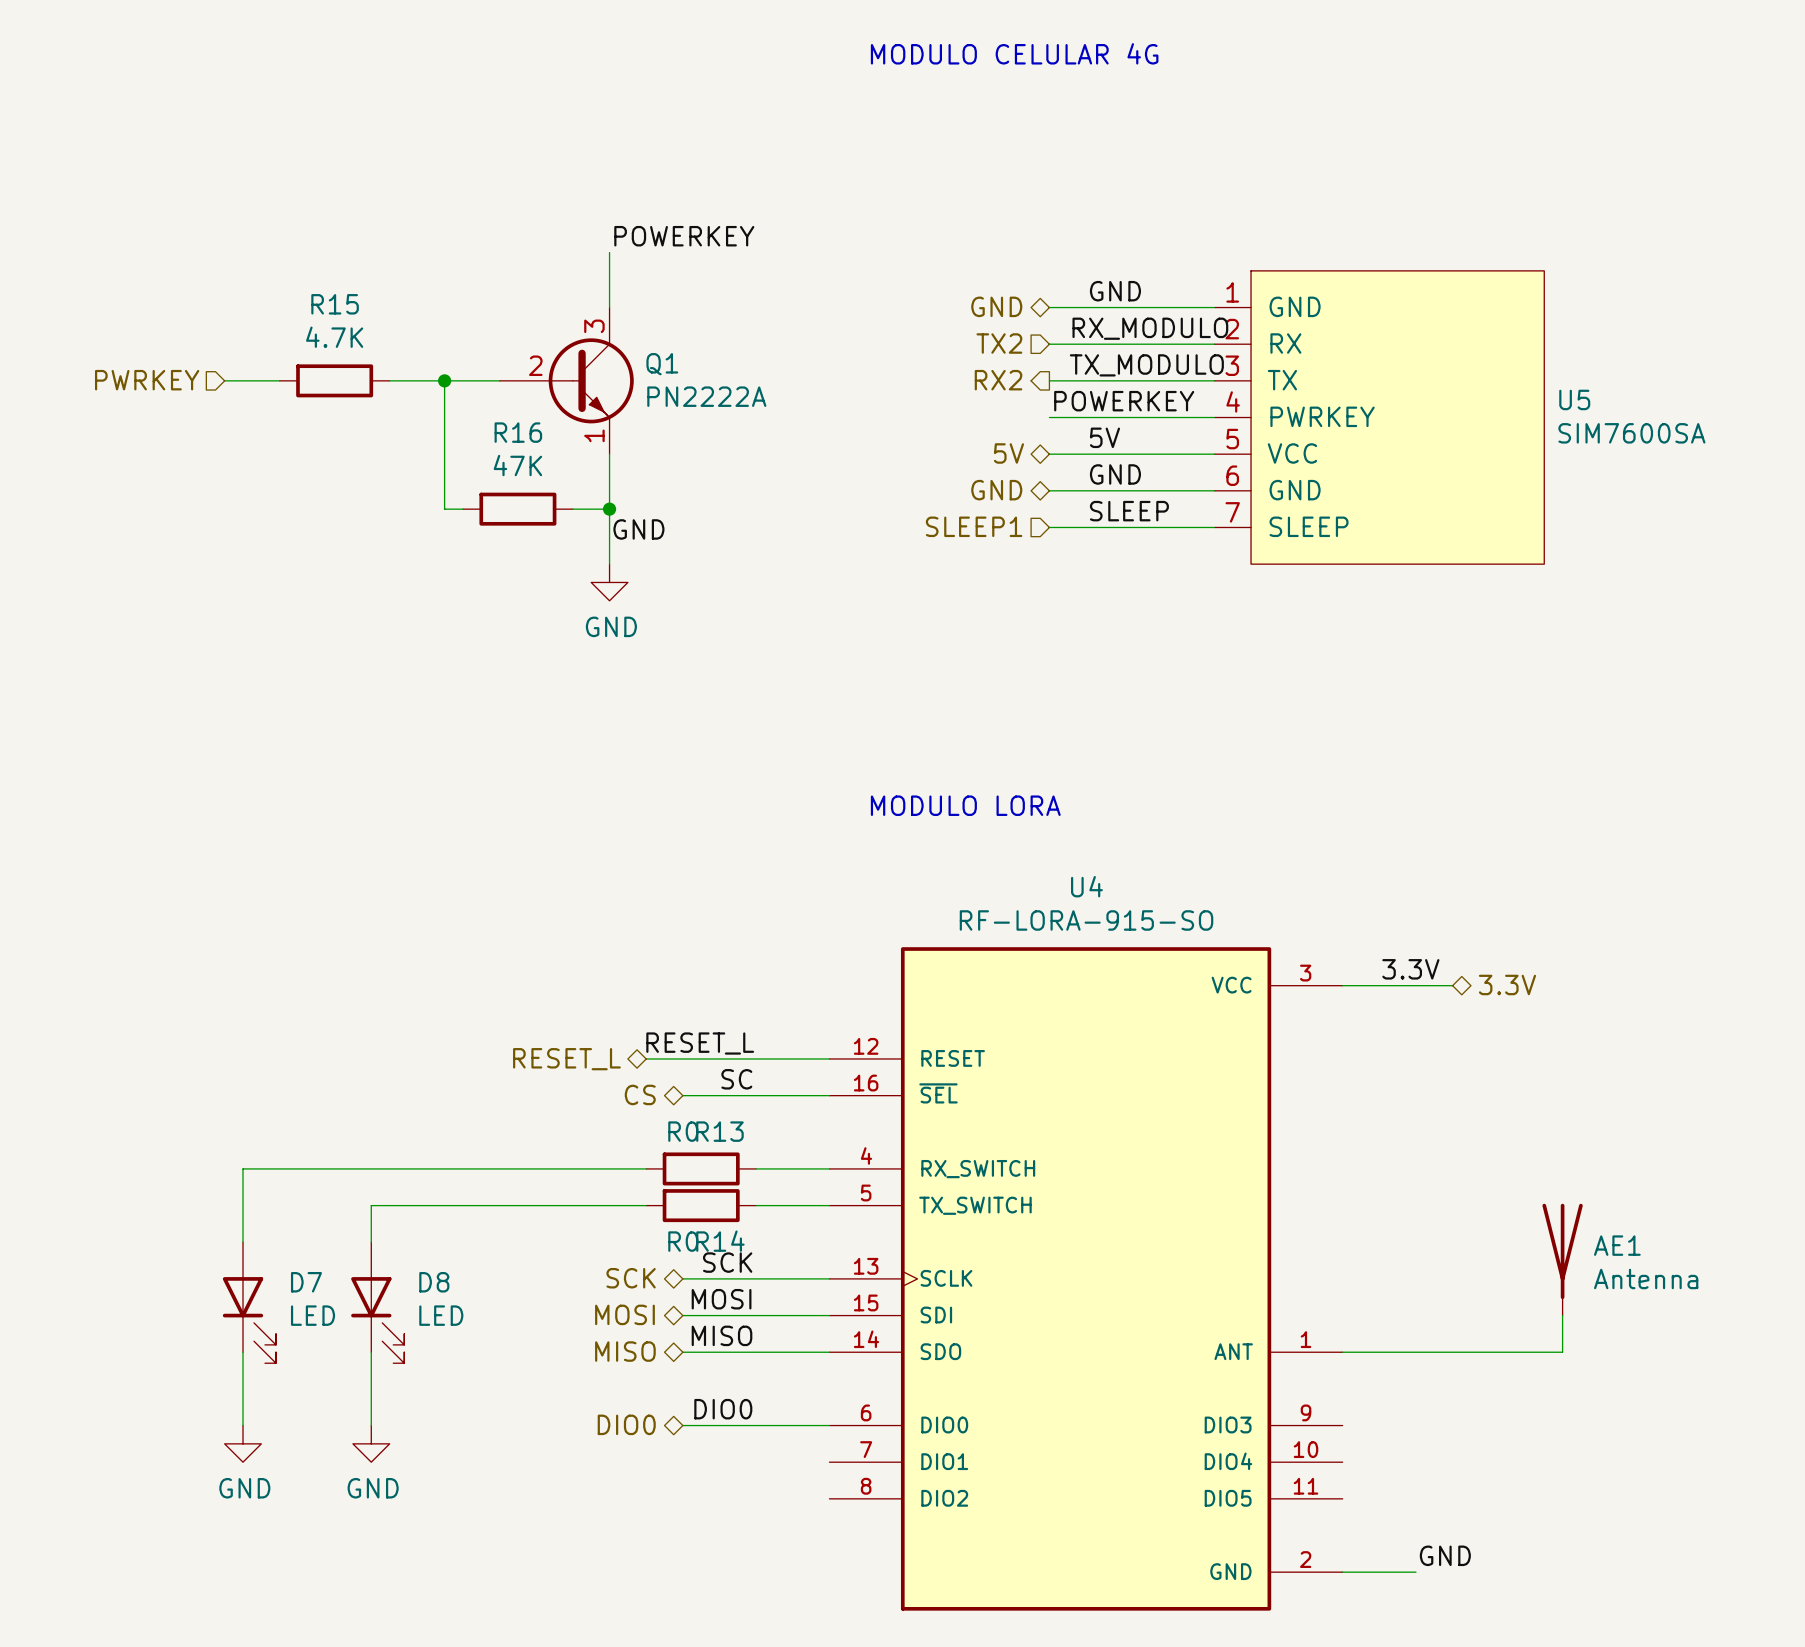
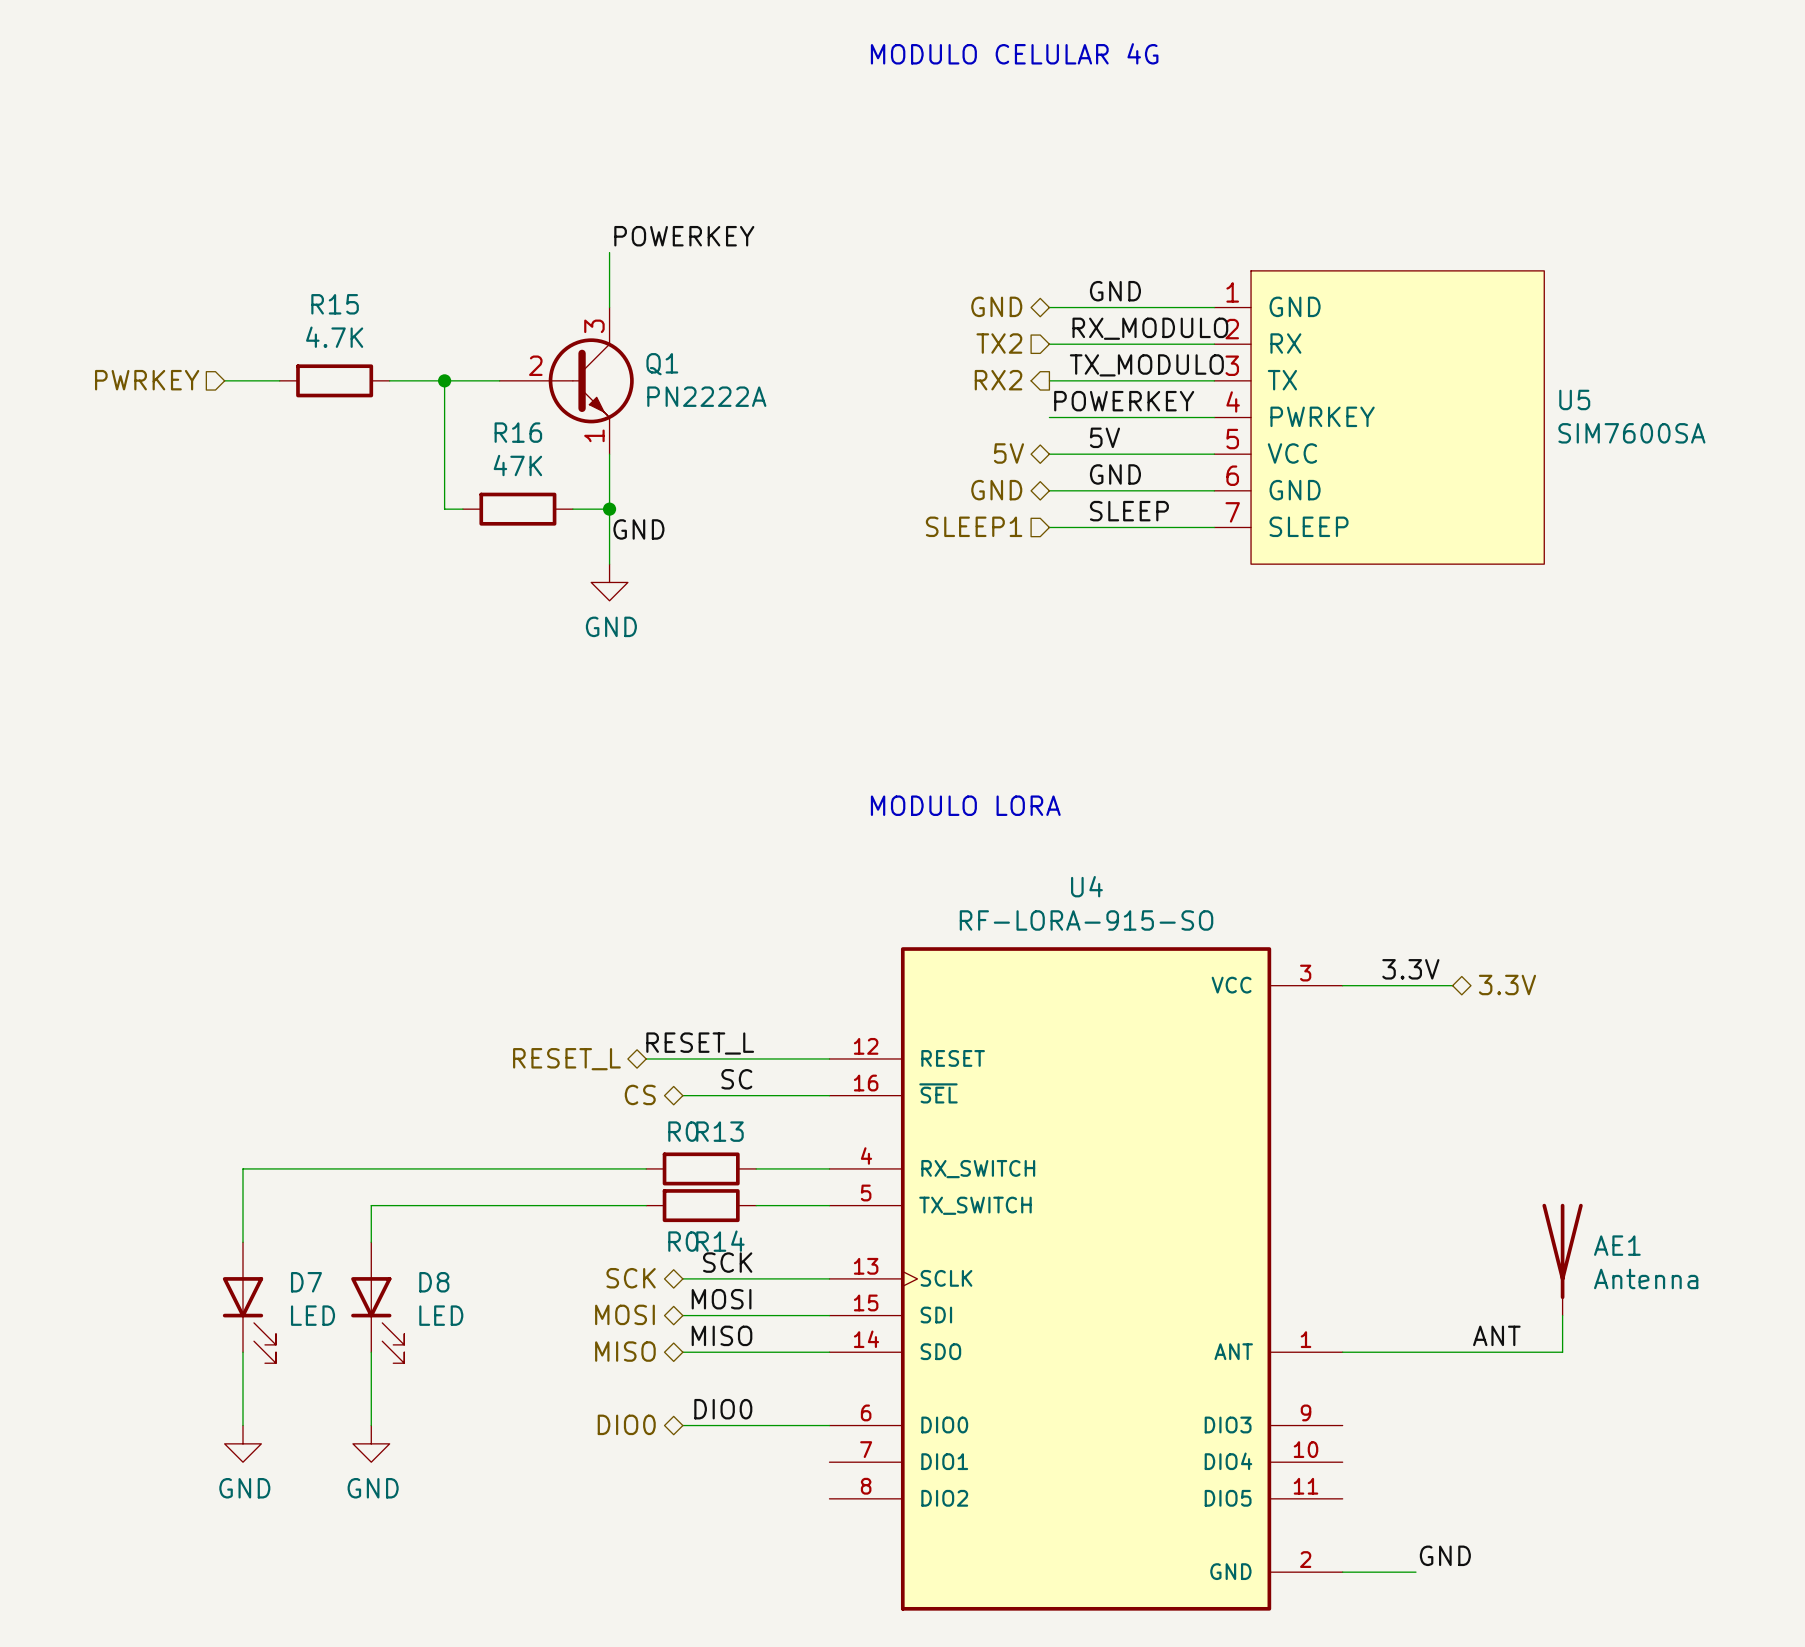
label: none -> ANT (1496, 1335)

